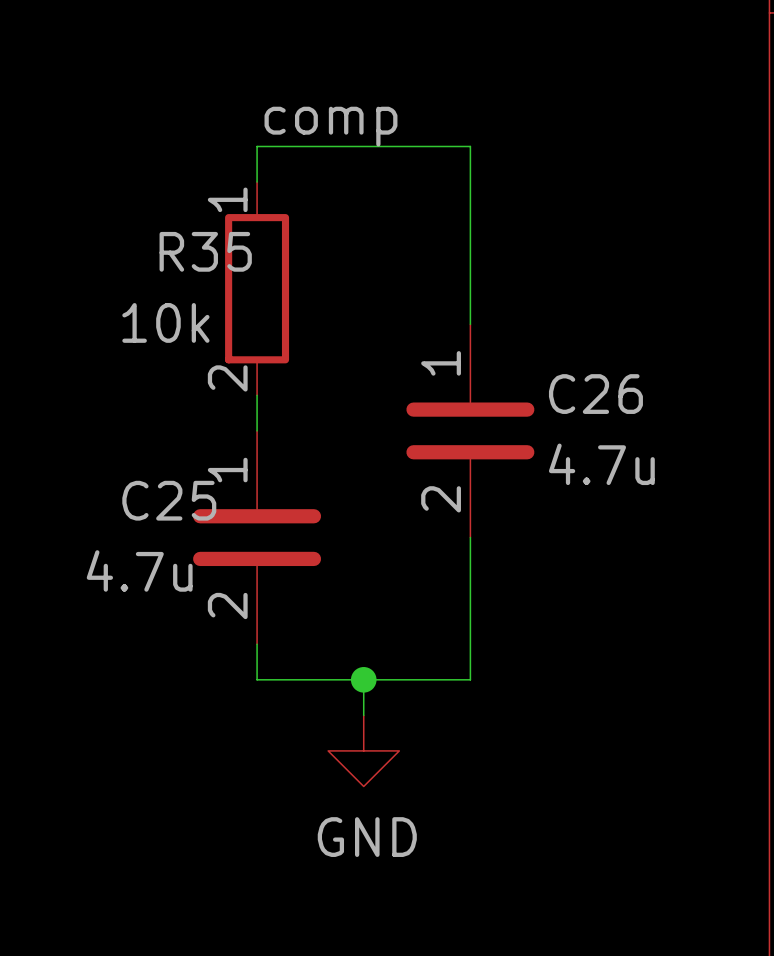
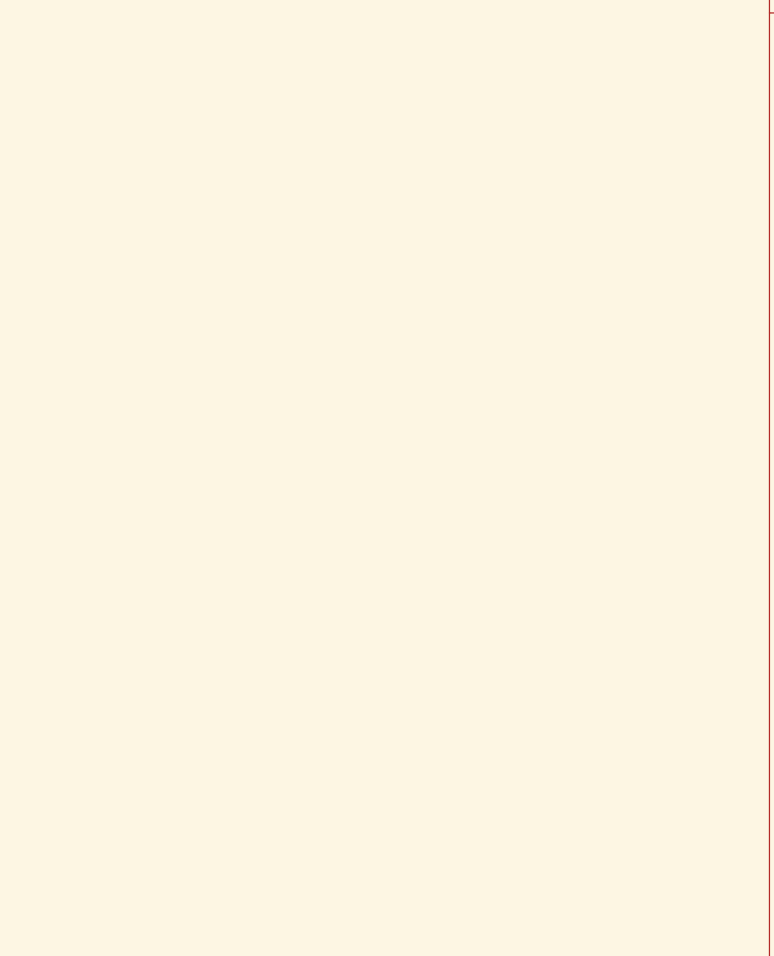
label: comp (330, 126) -> none
wire: (257, 182) (257, 146) (470, 146) (470, 324) -> none
R35: 10k (257, 288) -> none
wire: (257, 395) (257, 430) -> none
C26: 4.7u (470, 430) -> none
C25: 4.7u (257, 537) -> none
wire: (470, 537) (470, 679) (257, 679) (257, 644) -> none
wire: (363, 679) (363, 715) -> none
junction: (363, 679) -> none
power symbol: GND (363, 750) -> none

